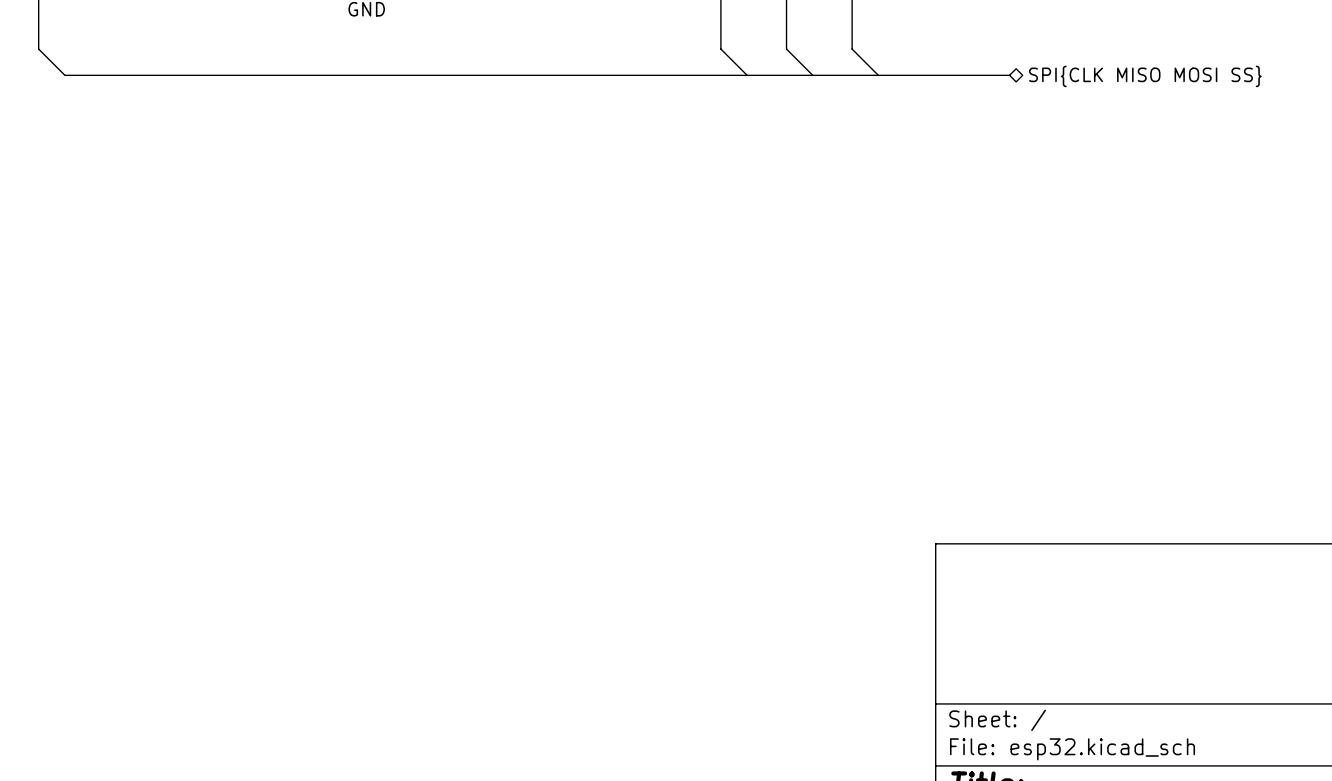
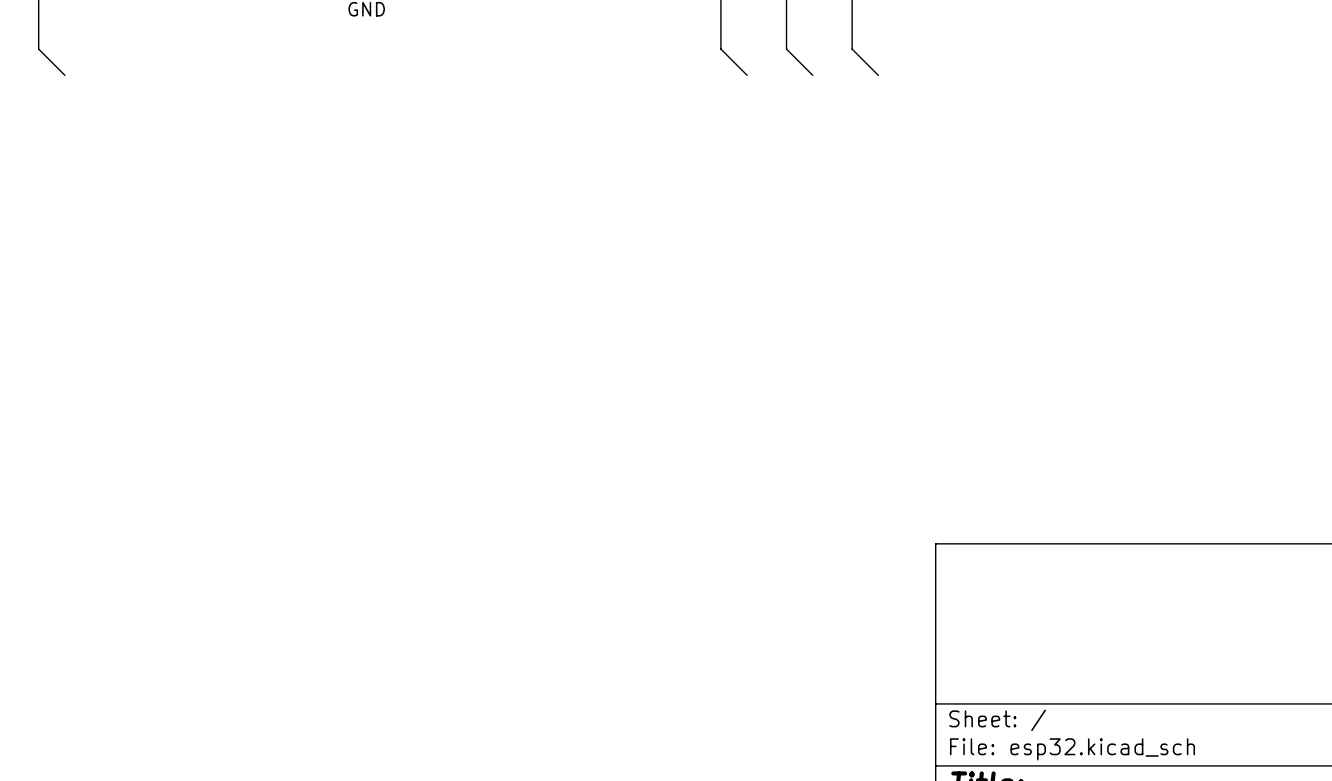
bus: (64, 75) (1009, 75) -> none
hierarchical label: SPI{CLK MISO MOSI SS} (1145, 76) -> none

